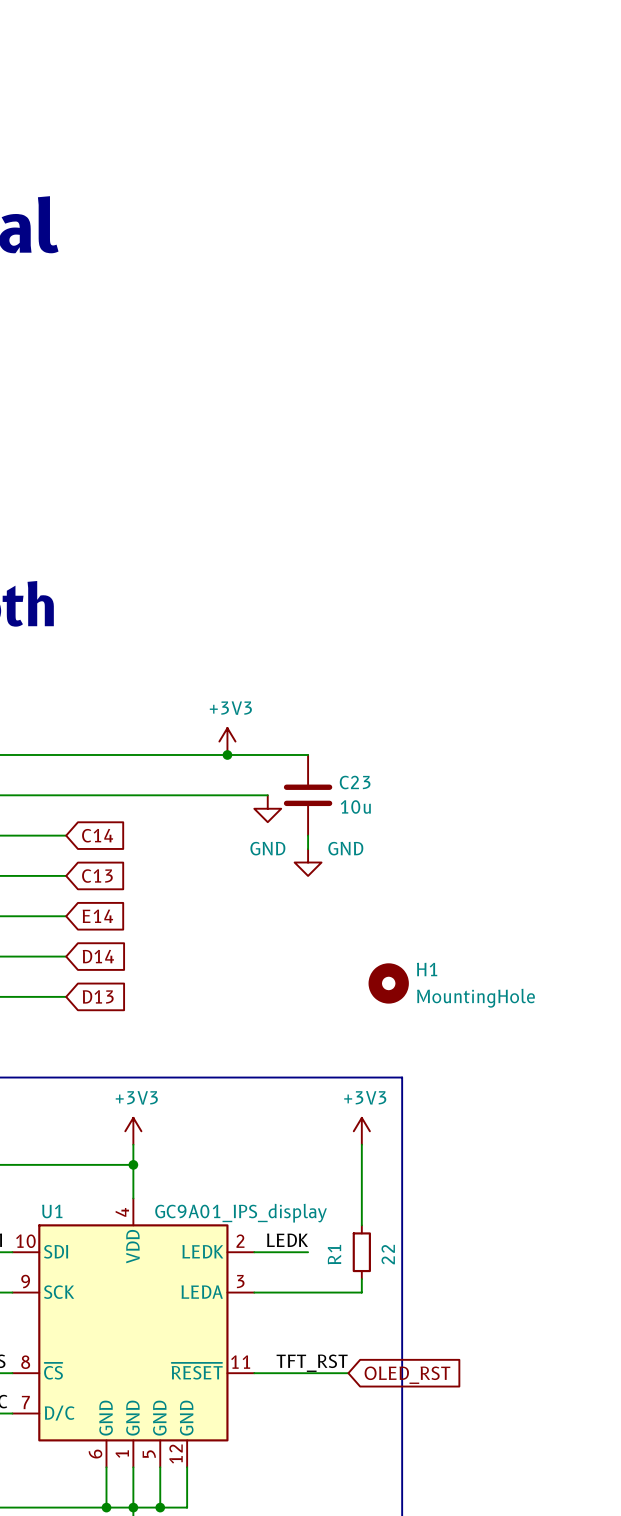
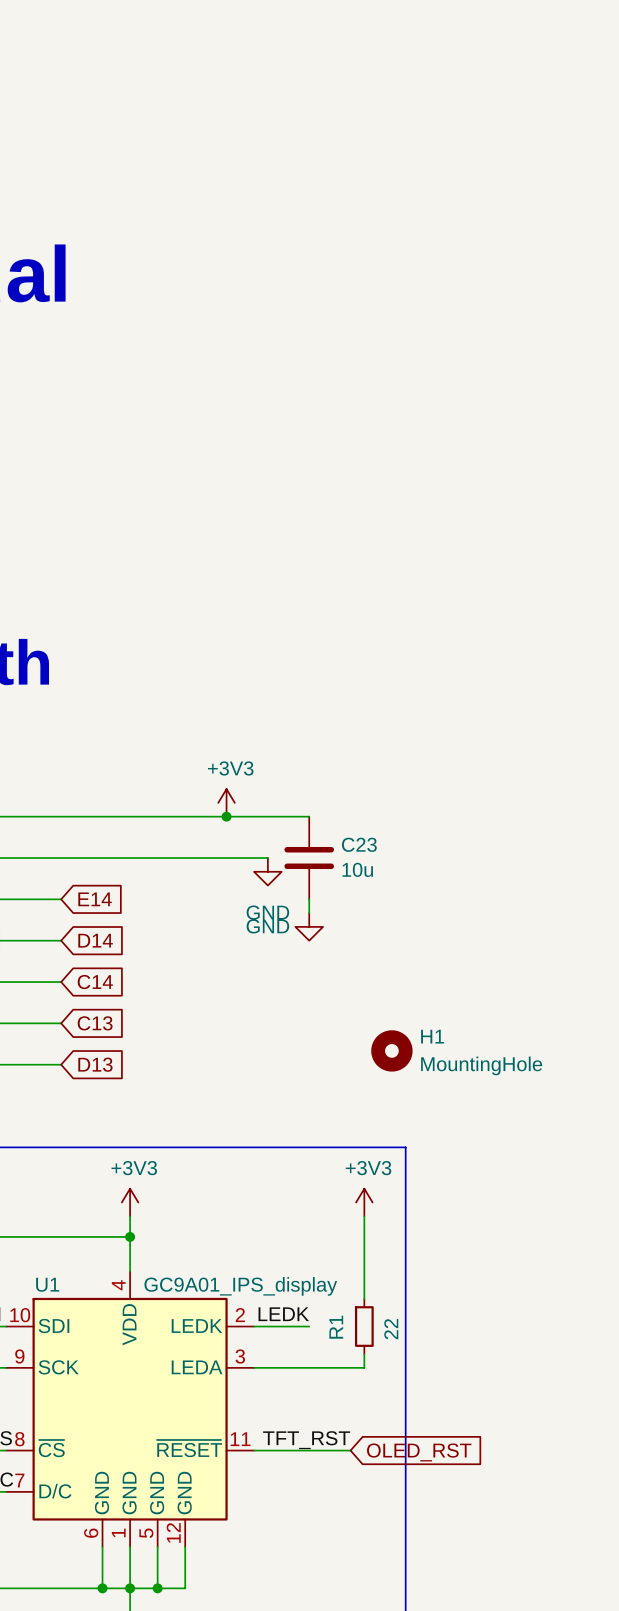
global label: C14 (97, 835) -> E14 (95, 899)
power symbol text position: GND (345, 848) -> GND (267, 926)
global label: C13 (97, 876) -> D14 (95, 940)
global label: E14 (97, 916) -> C14 (95, 982)
global label: D14 (98, 956) -> C13 (95, 1023)

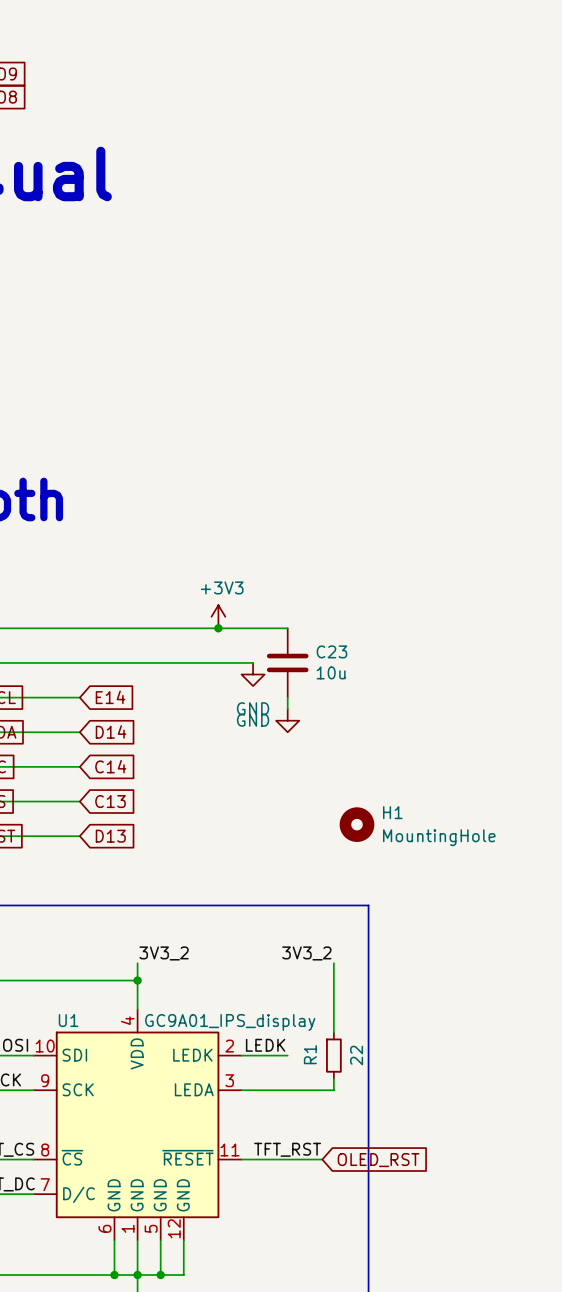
power symbol: +3V3 (130, 1202) -> none
power symbol: +3V3 (364, 1202) -> none
label: none -> 3V3_2 (164, 953)
label: none -> 3V3_2 (306, 953)

